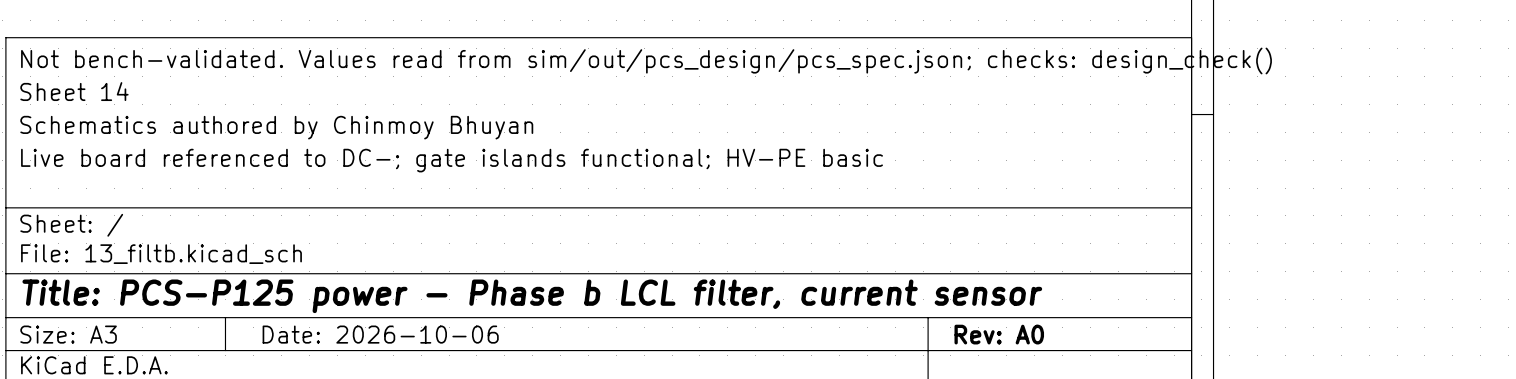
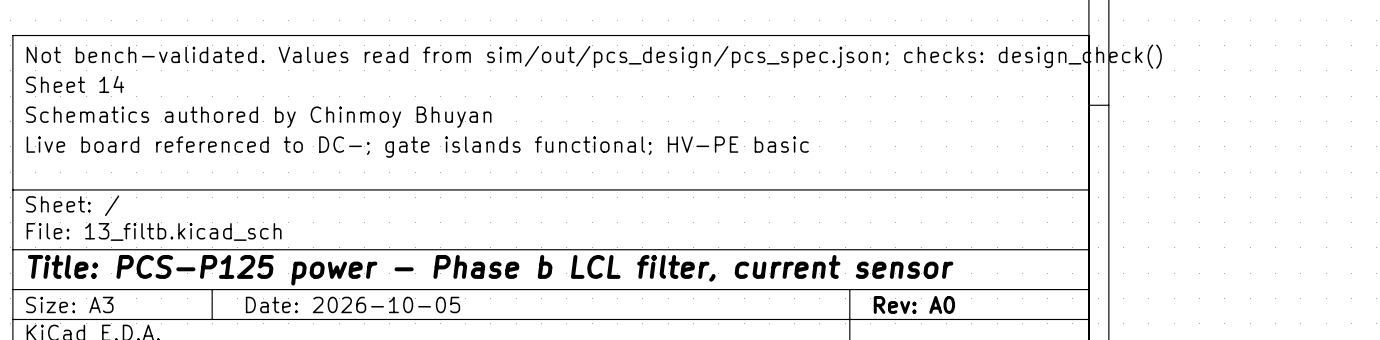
title block: Date: 2026-10-06 (380, 334) -> Date: 2026-10-05 (353, 304)

